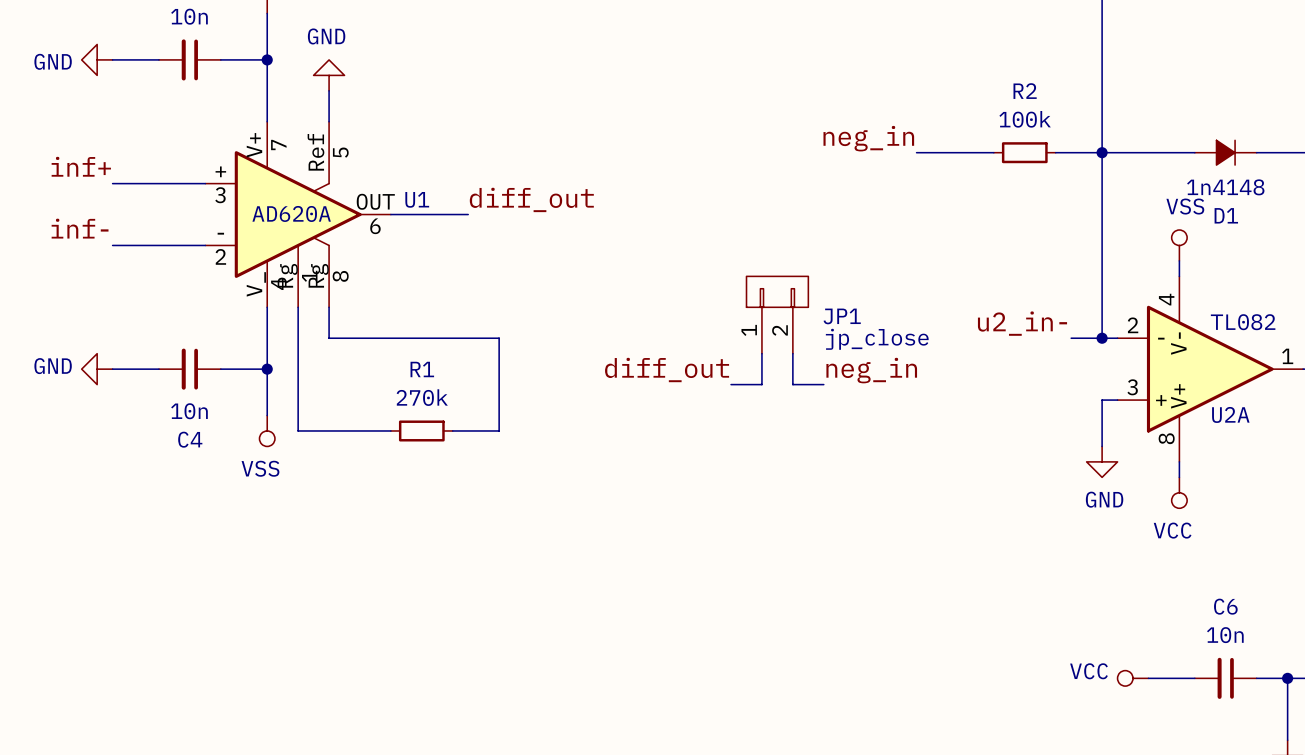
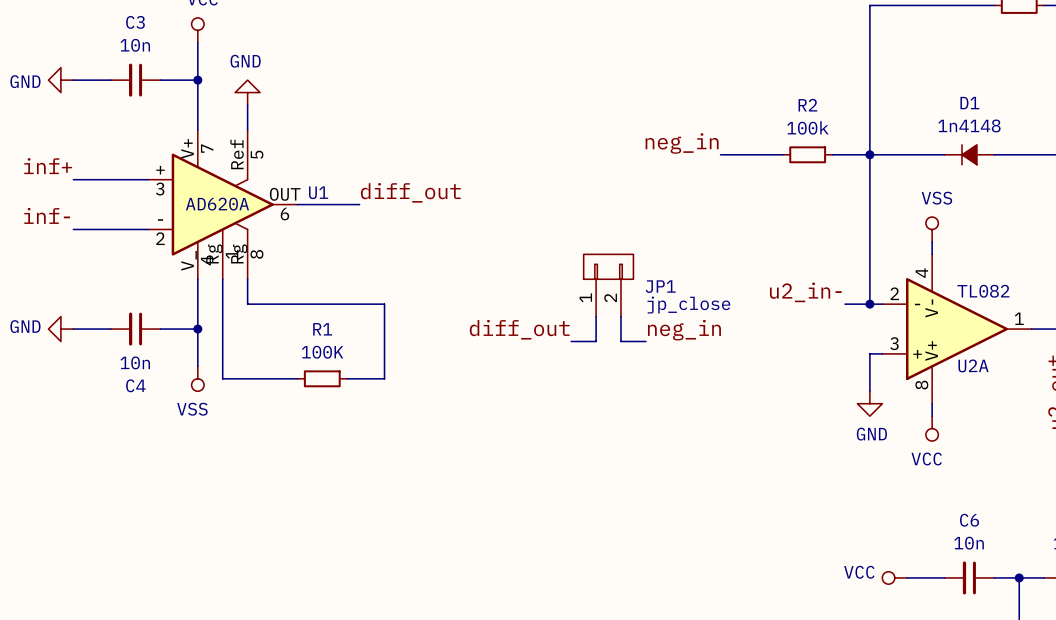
D1 rotation: 0° (1225, 152) -> 180° (969, 154)
R1 value: 270k (422, 397) -> 100K (322, 352)

